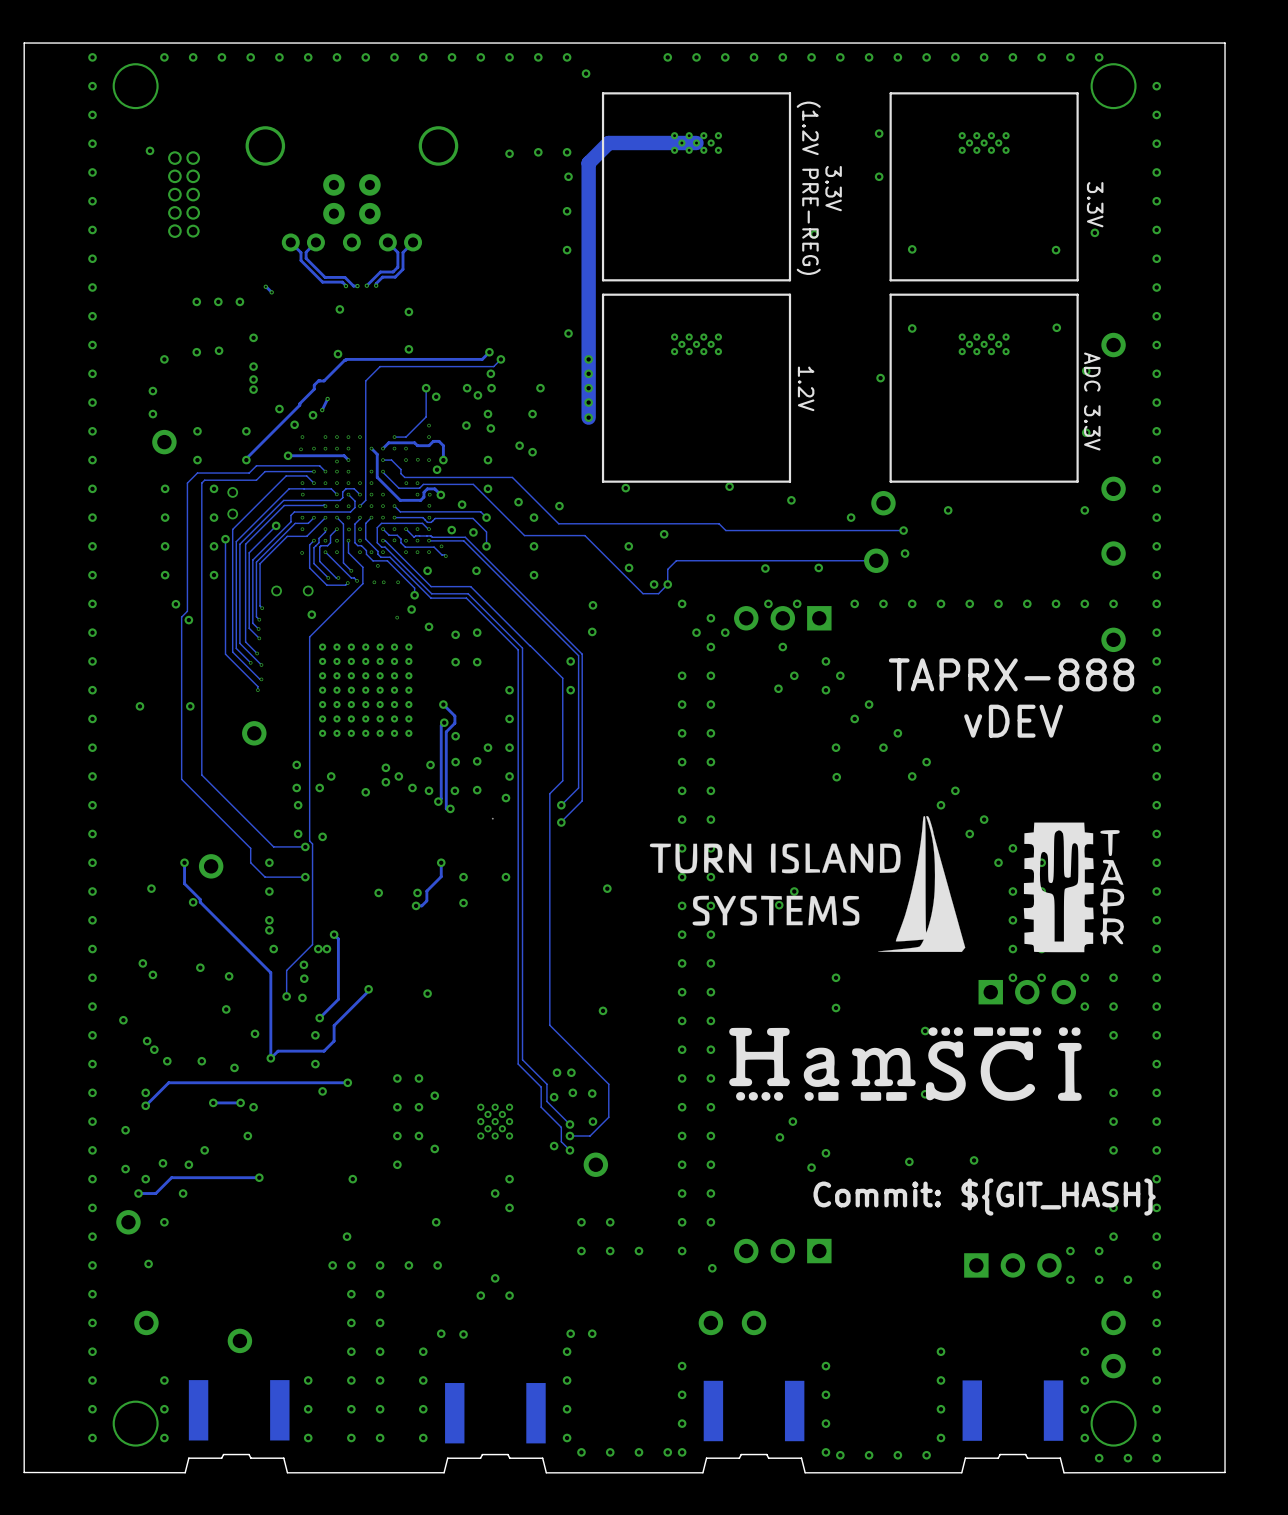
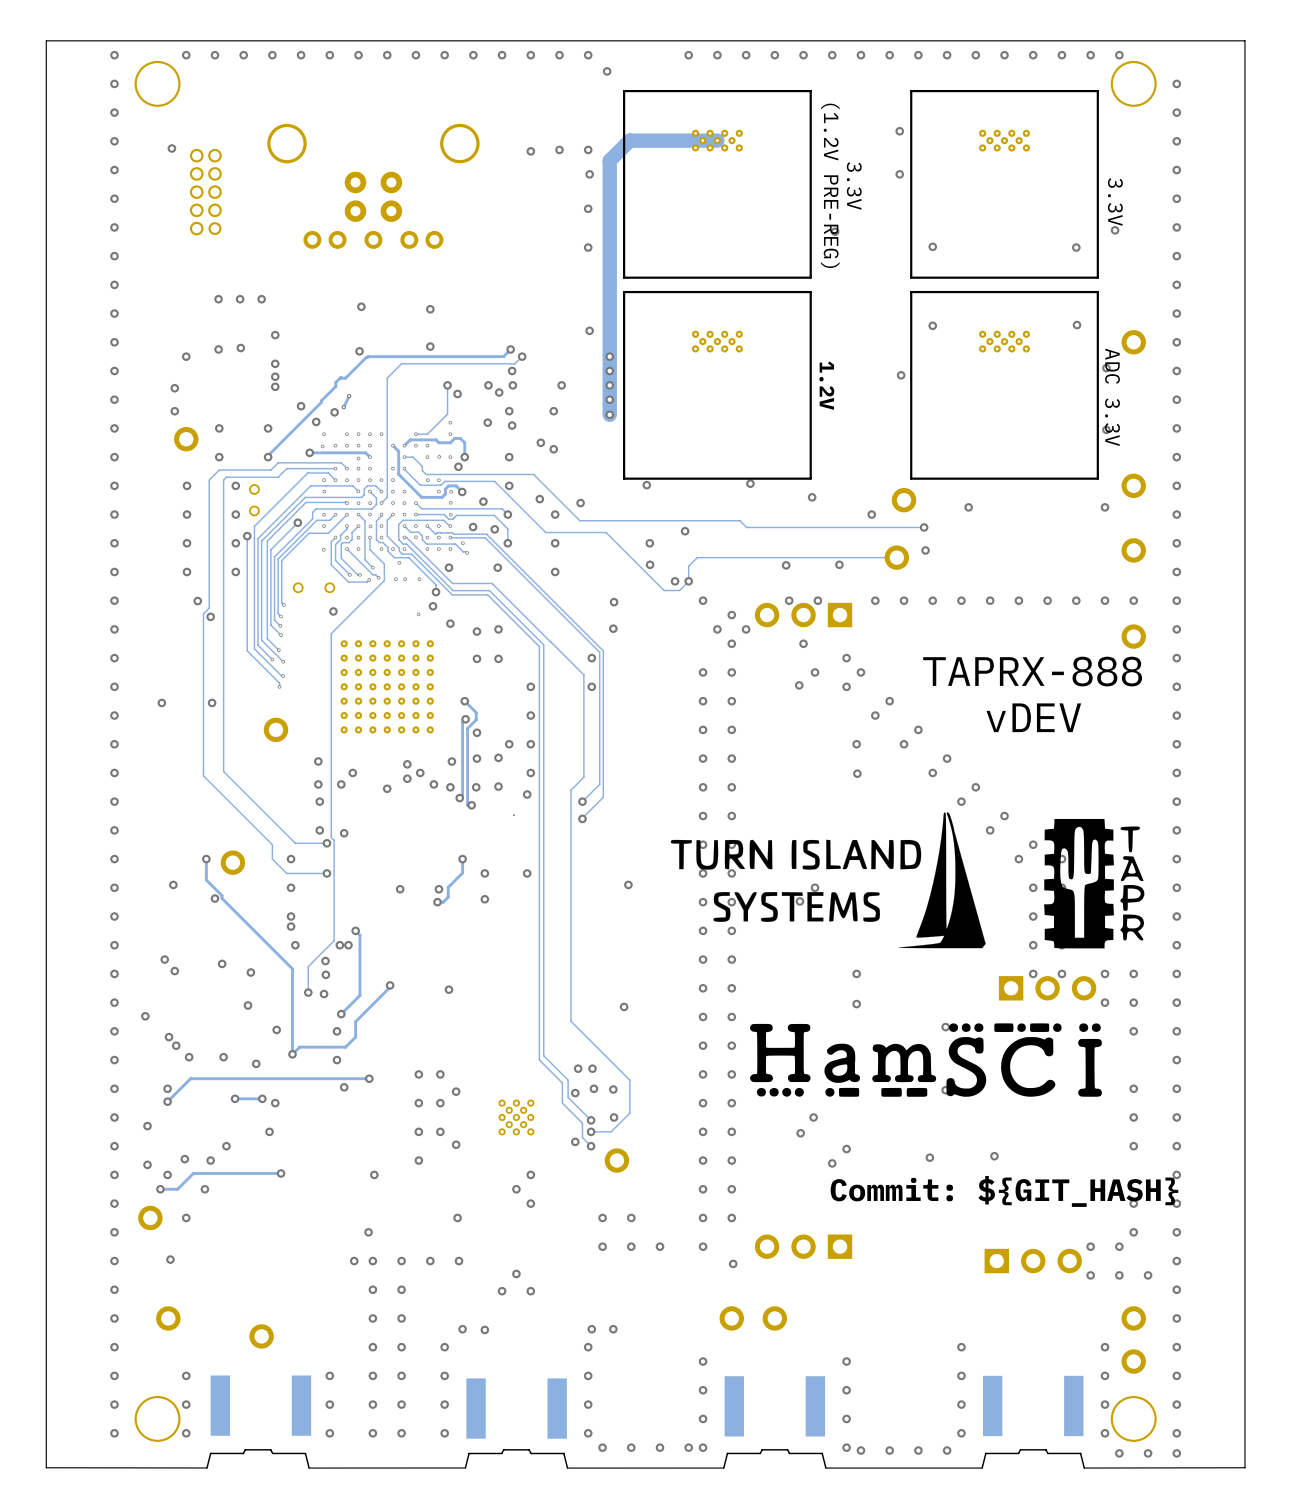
track: (290, 242) (300, 252) (300, 260) (322, 282) (342, 282) (345, 286) -> none
track: (387, 242) (397, 252) (397, 267) (393, 272) (380, 272) (366, 285) -> none
track: (413, 242) (403, 252) (403, 269) (395, 277) (382, 277) (376, 285) -> none
track: (313, 245) (306, 252) (306, 258) (325, 277) (344, 277) (353, 286) (357, 286) -> none
via: (366, 285) -> none
via: (376, 285) -> none
track: (265, 286) (271, 292) -> none
via: (265, 286) -> none
via: (345, 286) -> none
via: (357, 286) -> none
via: (271, 292) -> none

